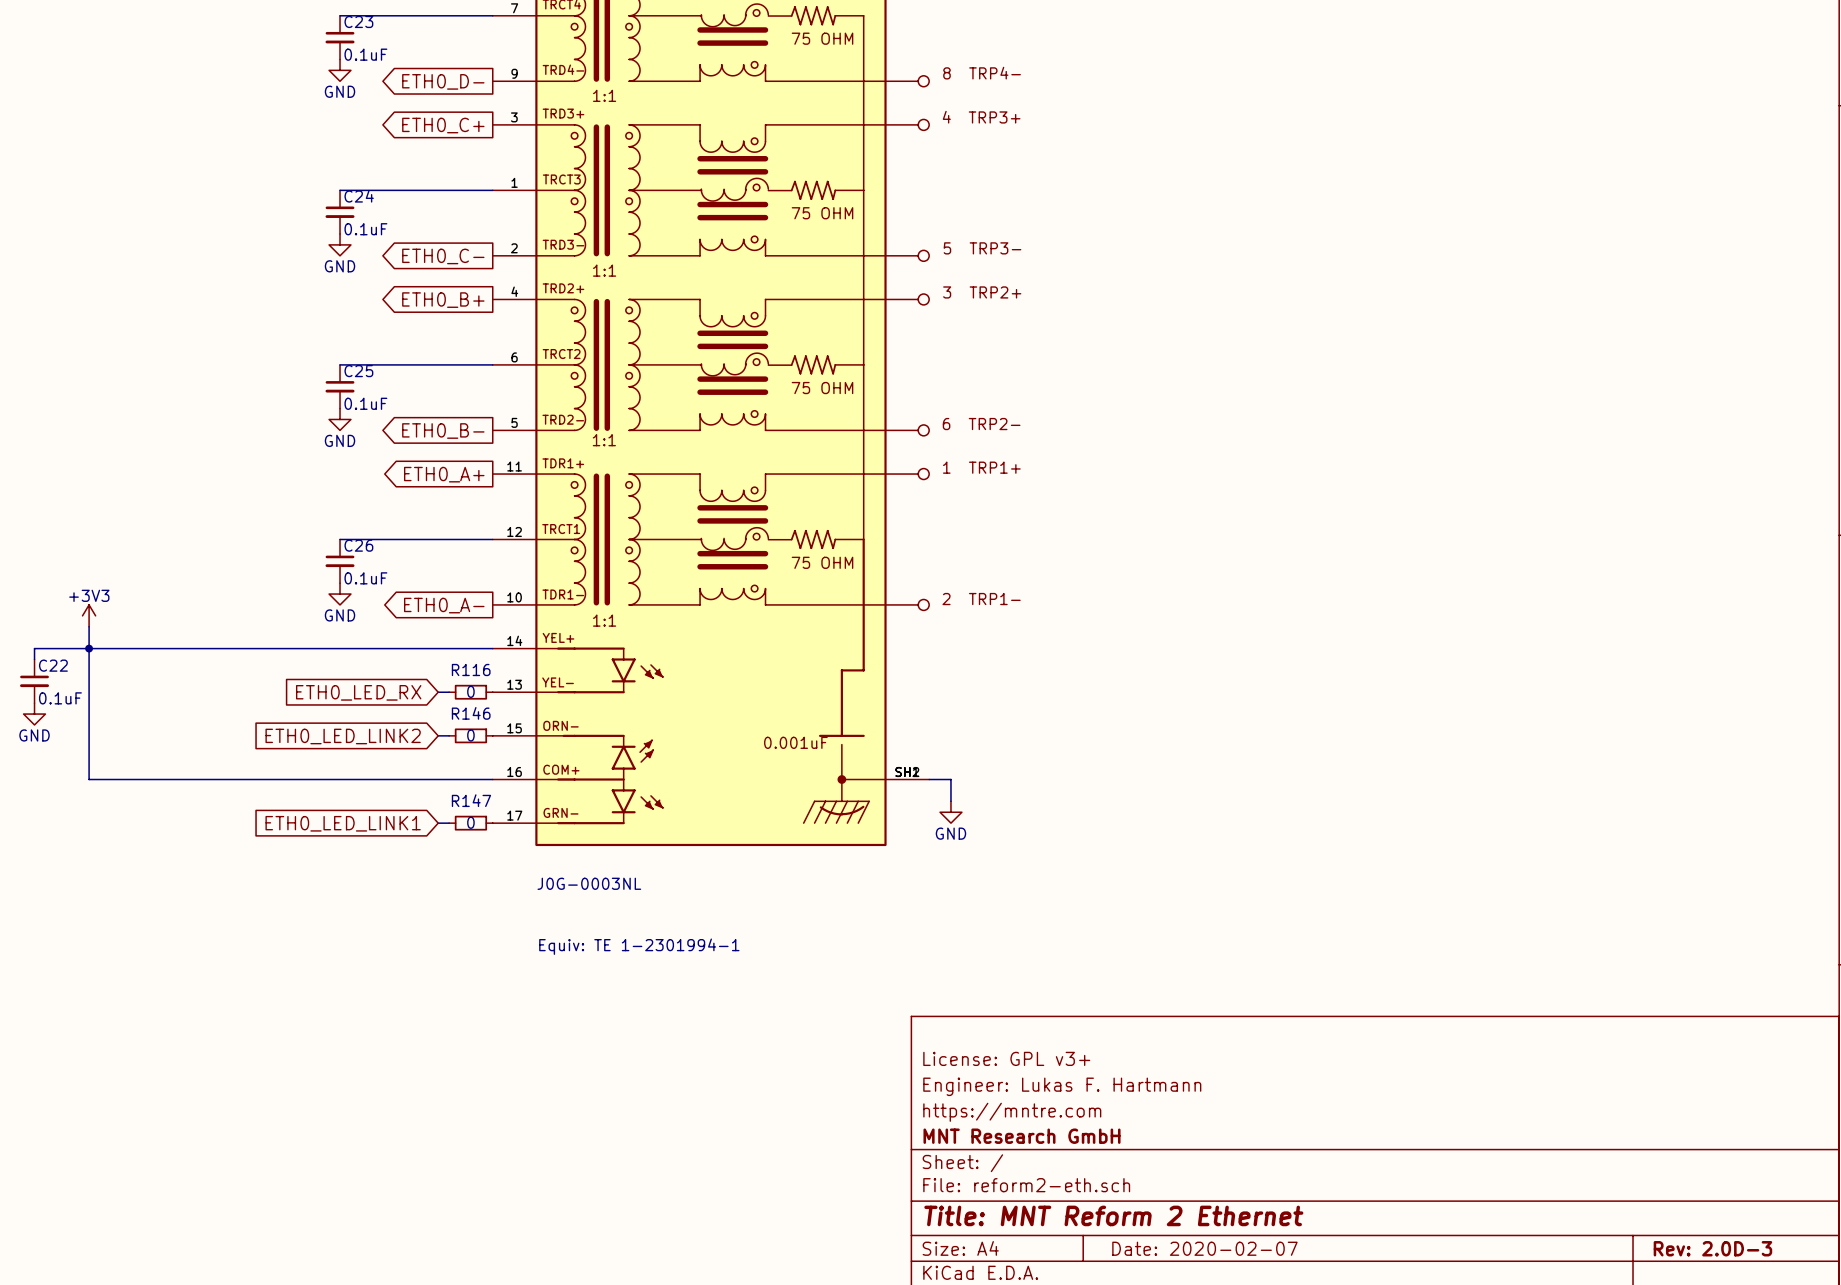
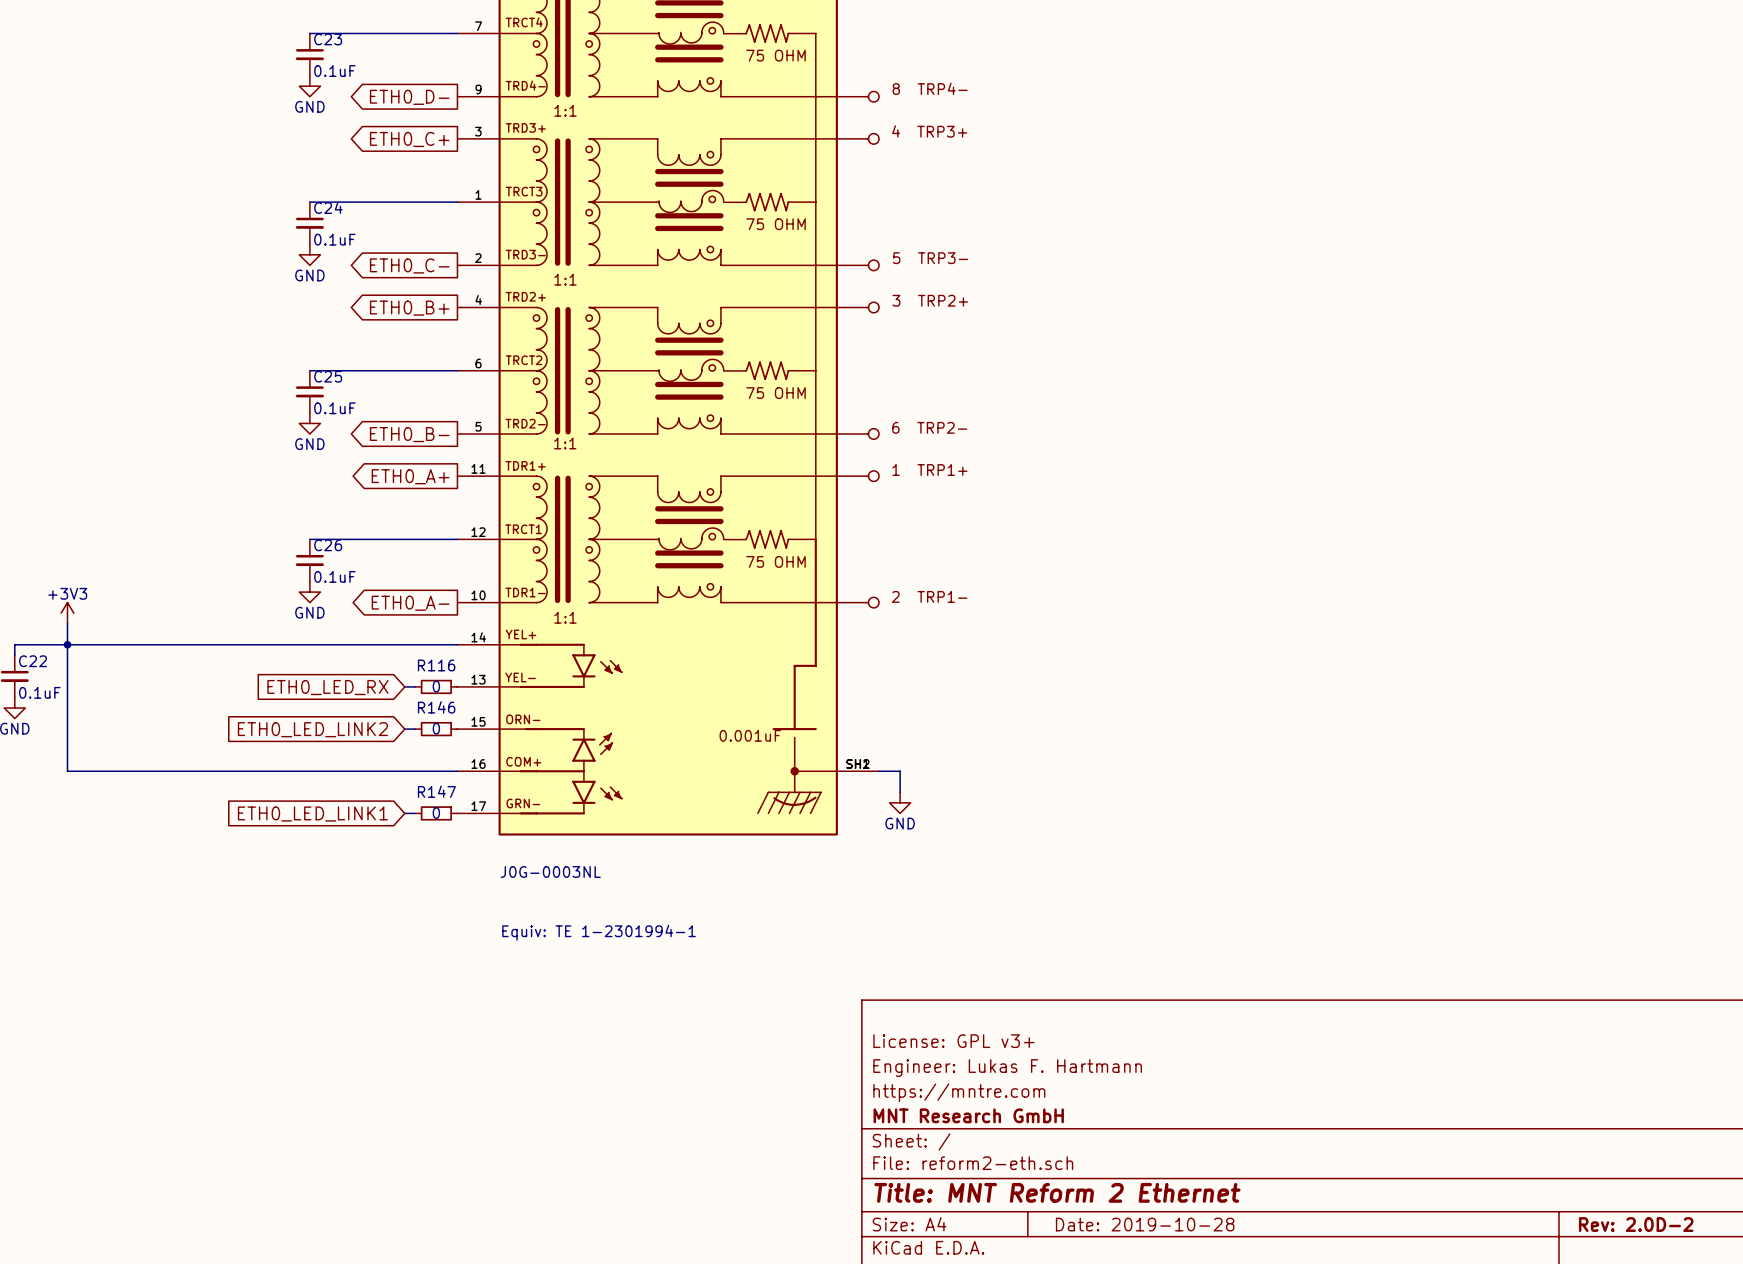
title block: Date: 2020-02-07 (1204, 1248) -> Date: 2019-10-28 (1145, 1224)
title block: Rev: 2.0D-3 (1712, 1248) -> Rev: 2.0D-2 (1636, 1224)

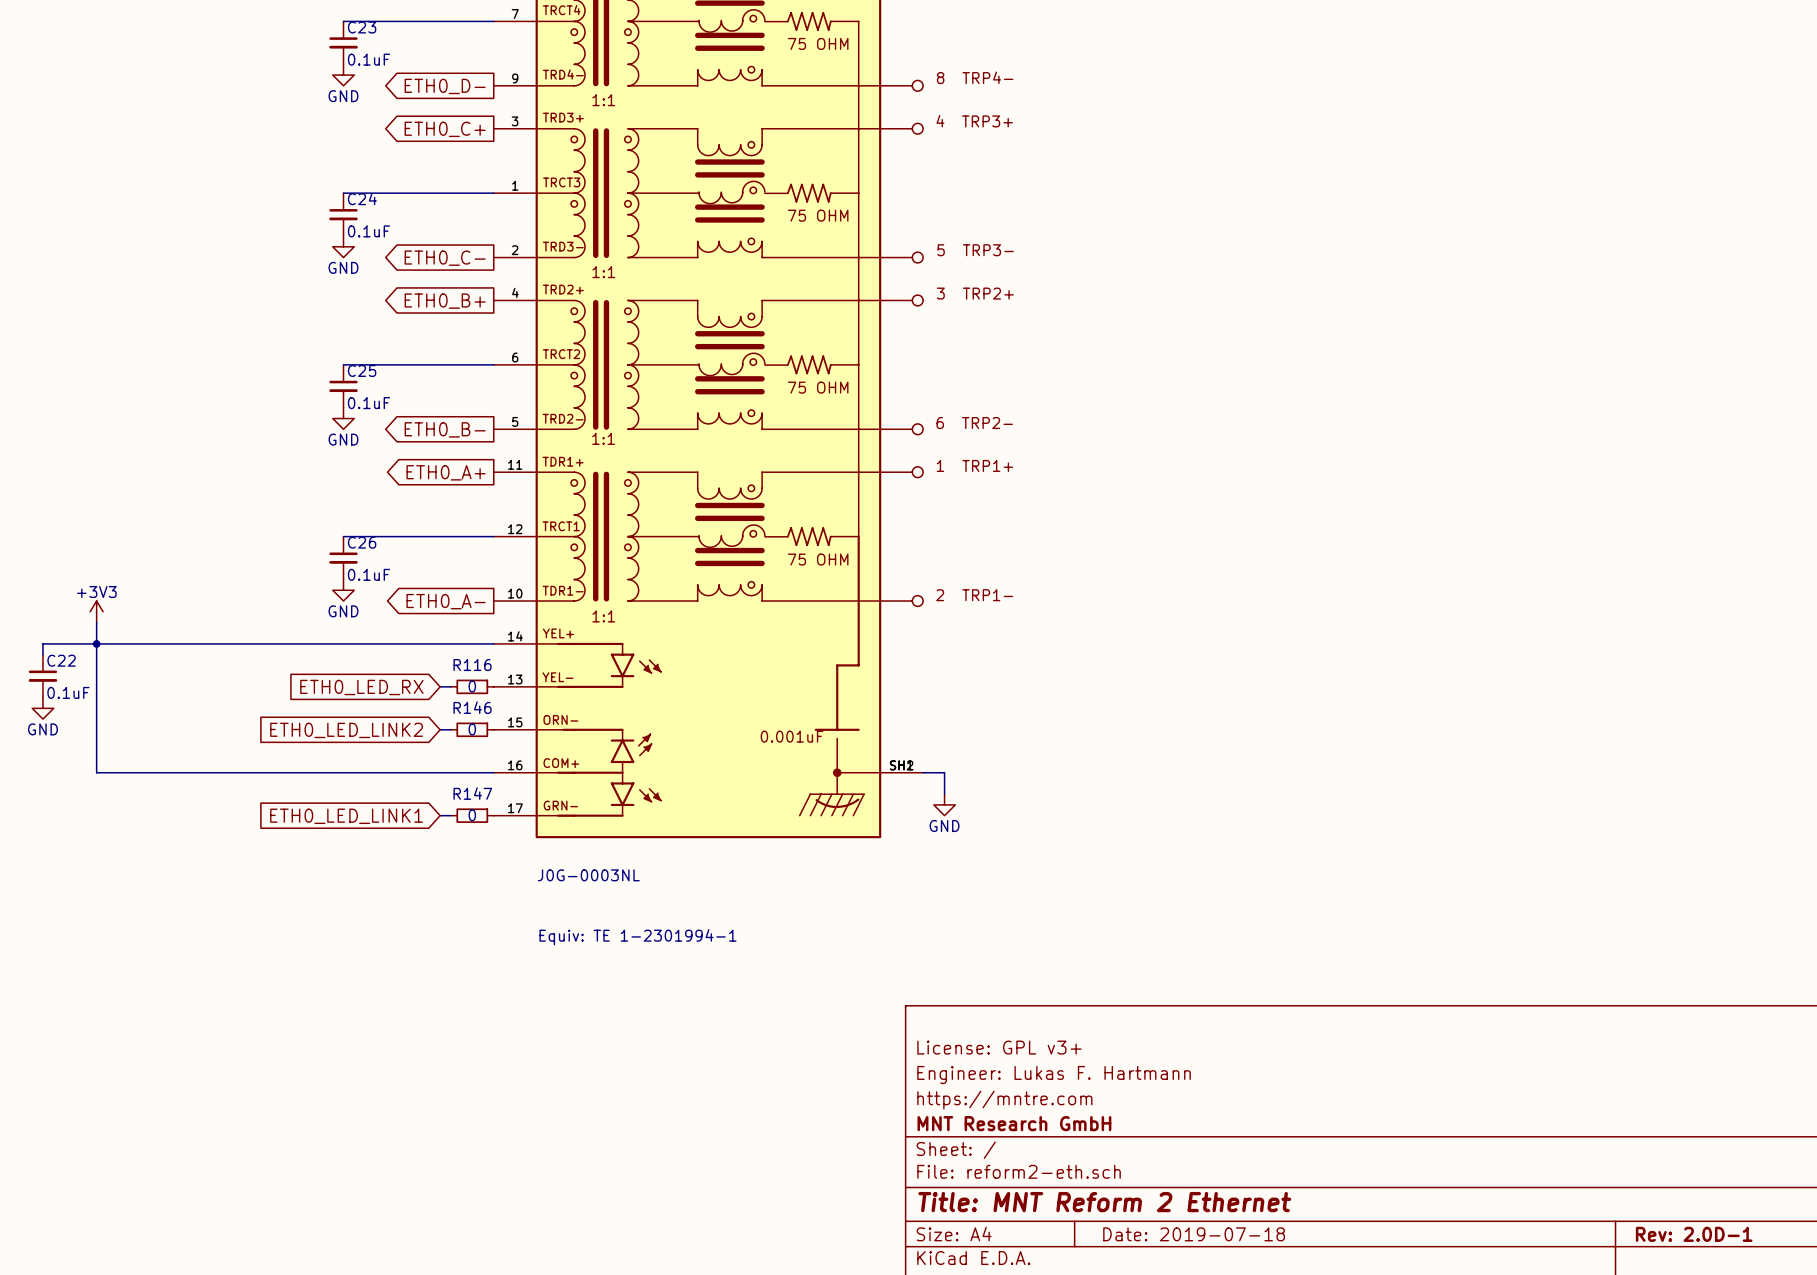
title block: Date: 2019-10-28 (1145, 1224) -> Date: 2019-07-18 (1194, 1234)
title block: Rev: 2.0D-2 (1636, 1224) -> Rev: 2.0D-1 (1694, 1234)

